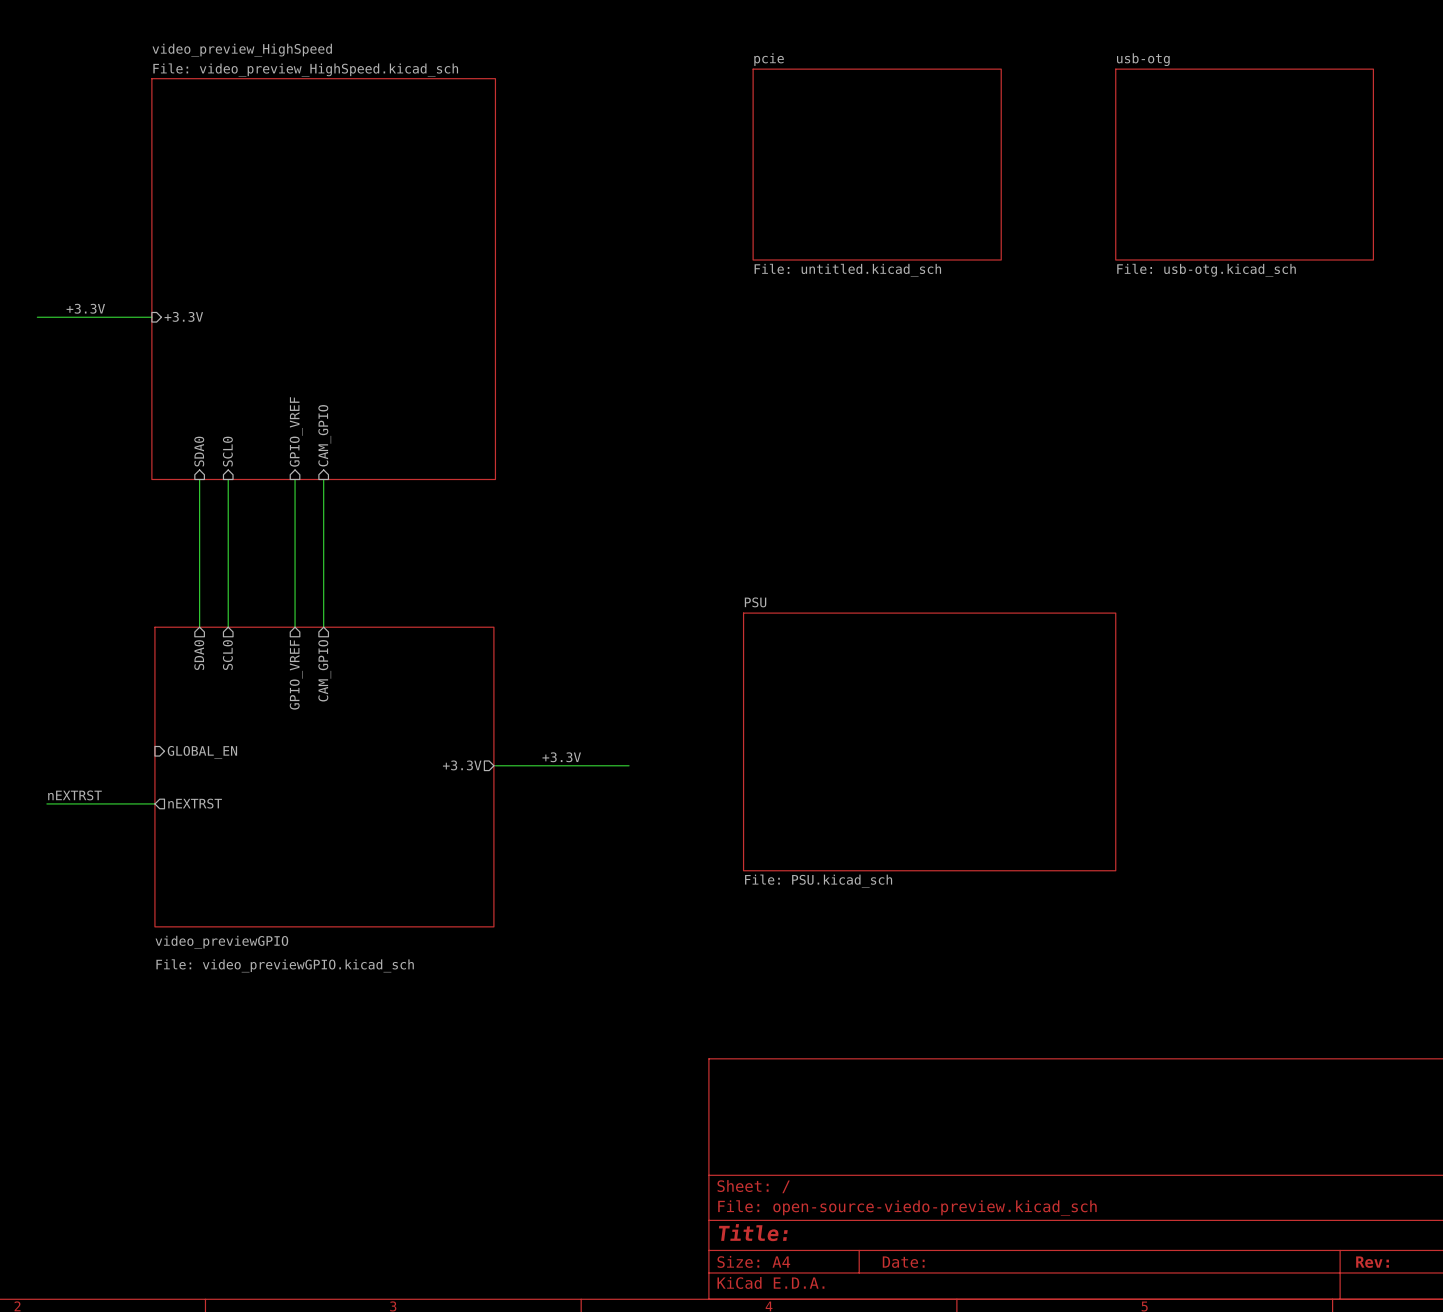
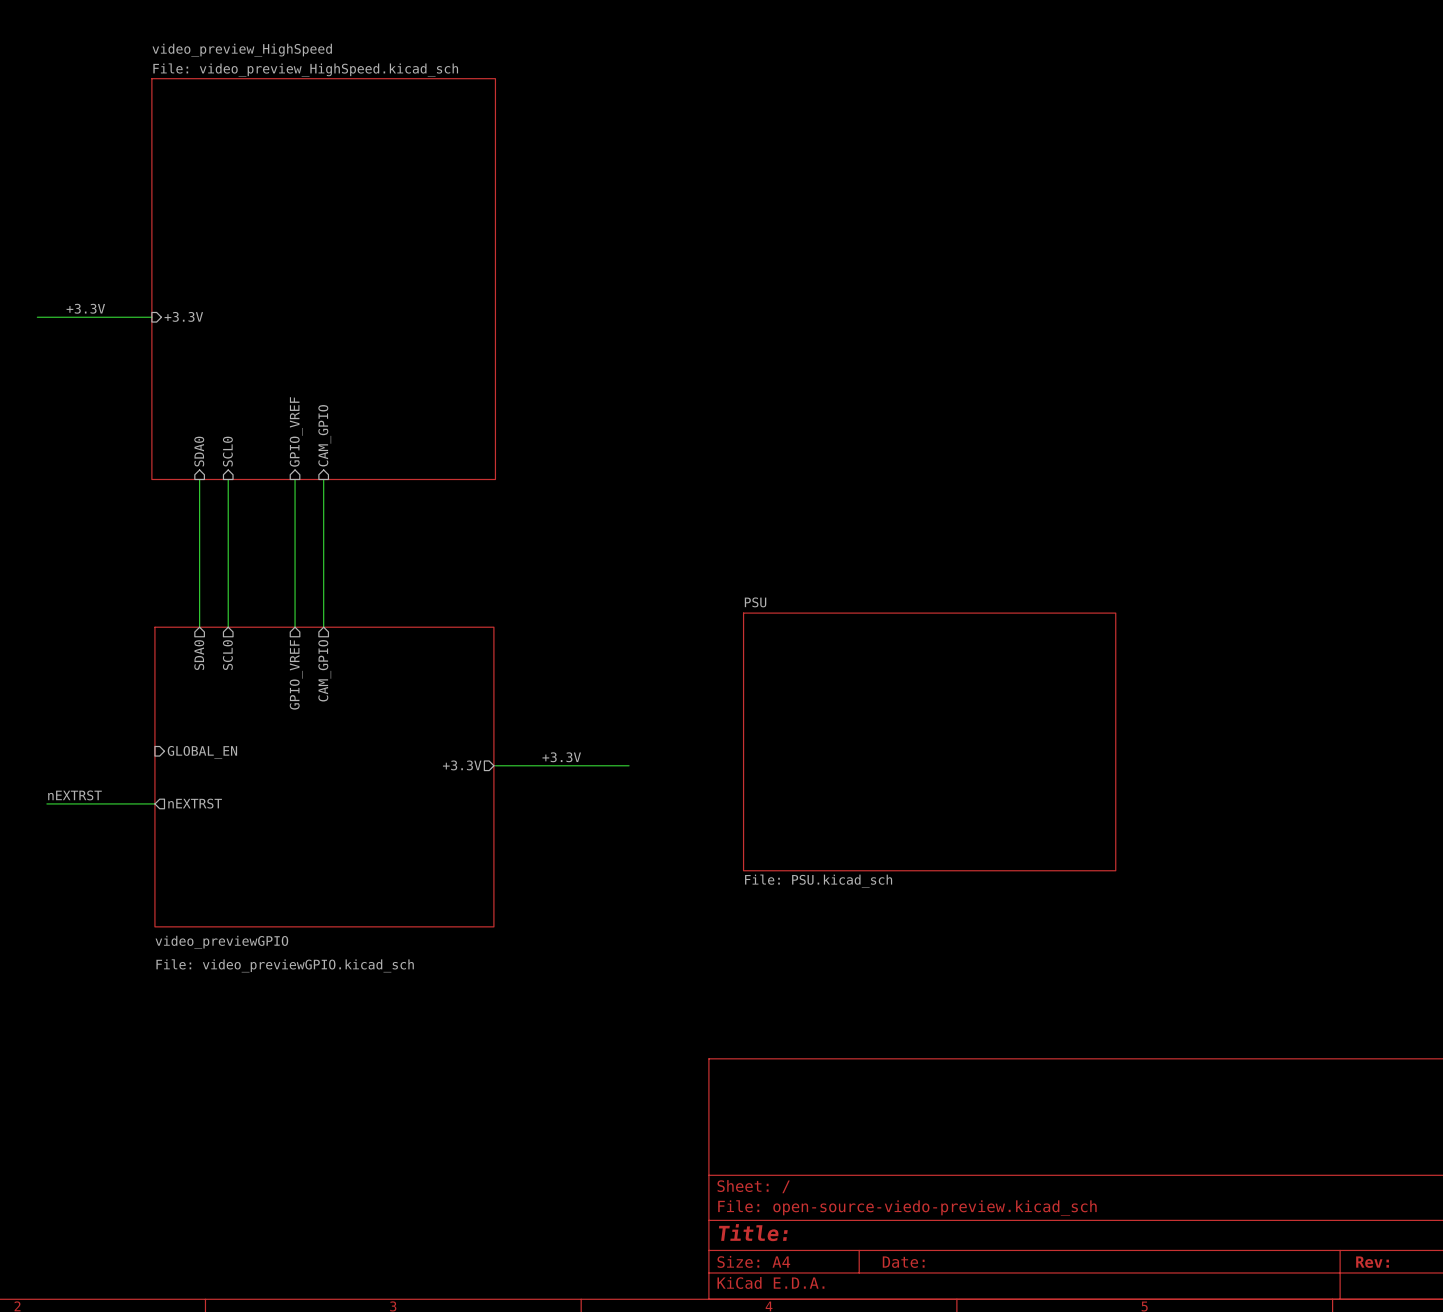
sheet pcie: File: untitled.kicad_sch (877, 164) -> none
sheet usb-otg: File: usb-otg.kicad_sch (1244, 164) -> none

